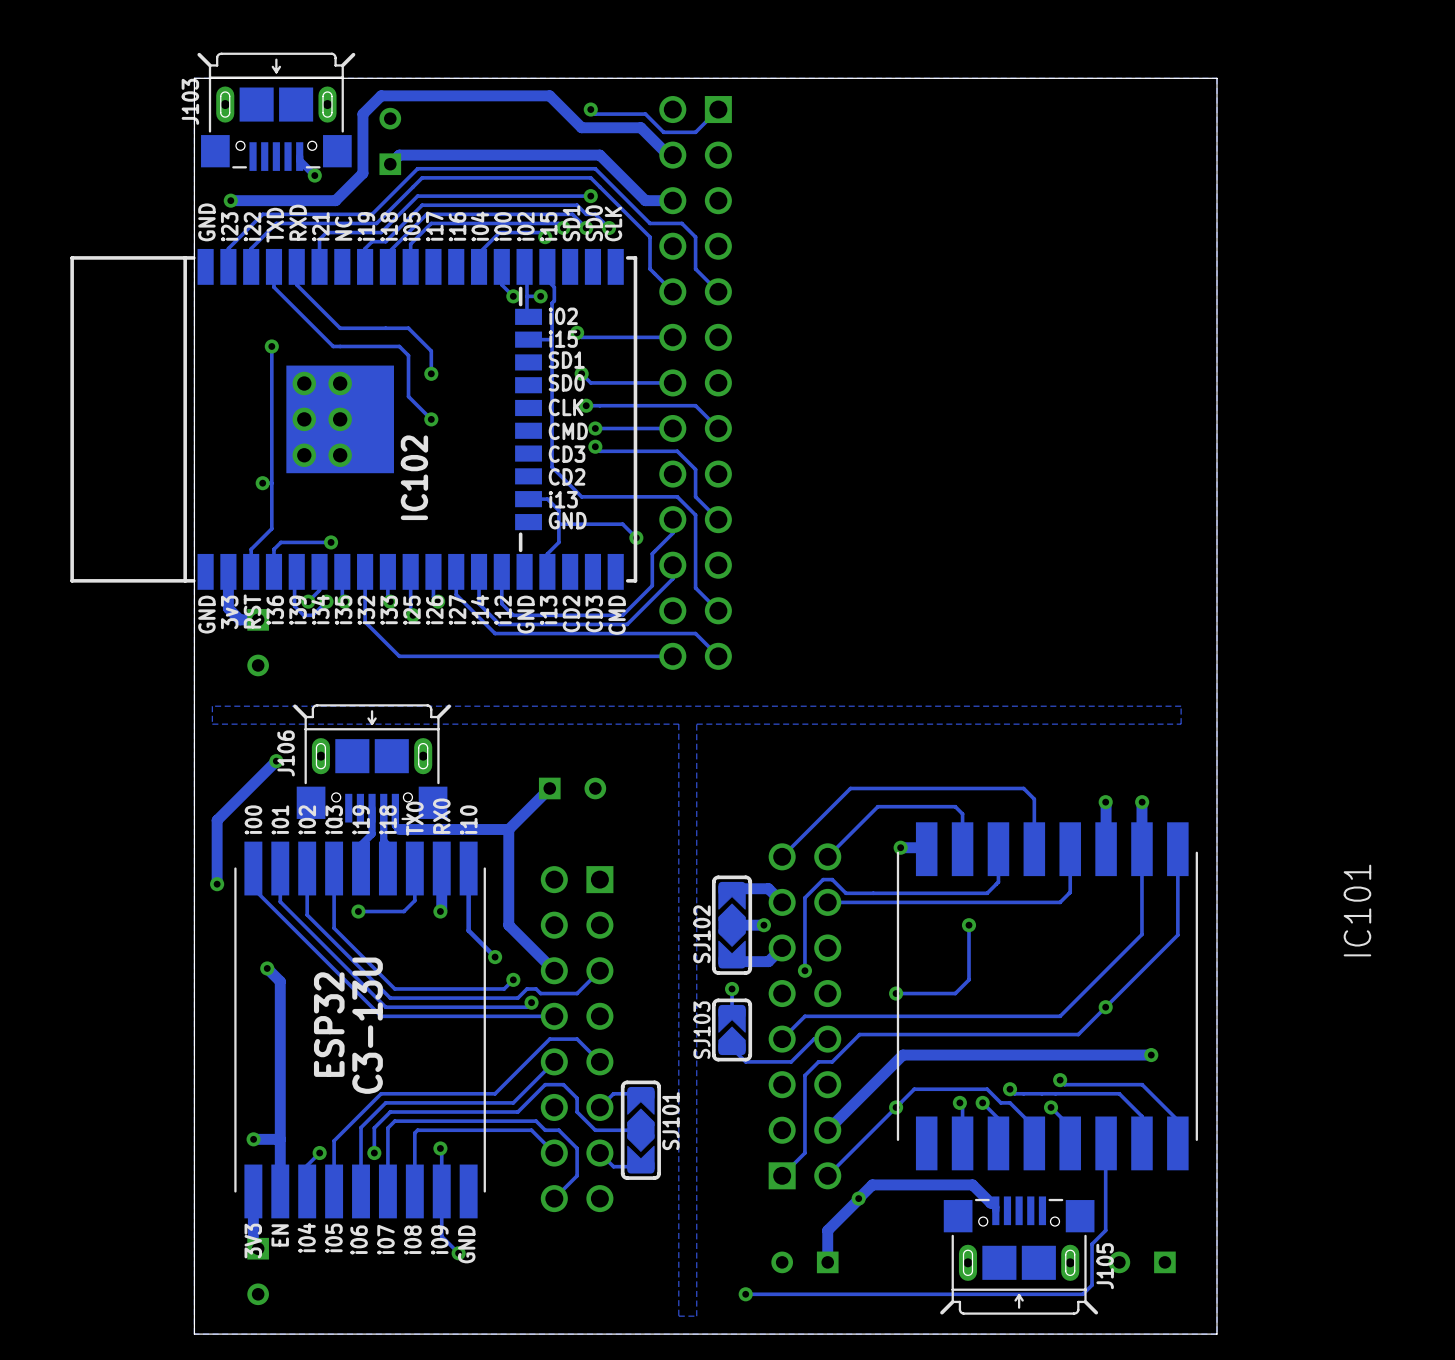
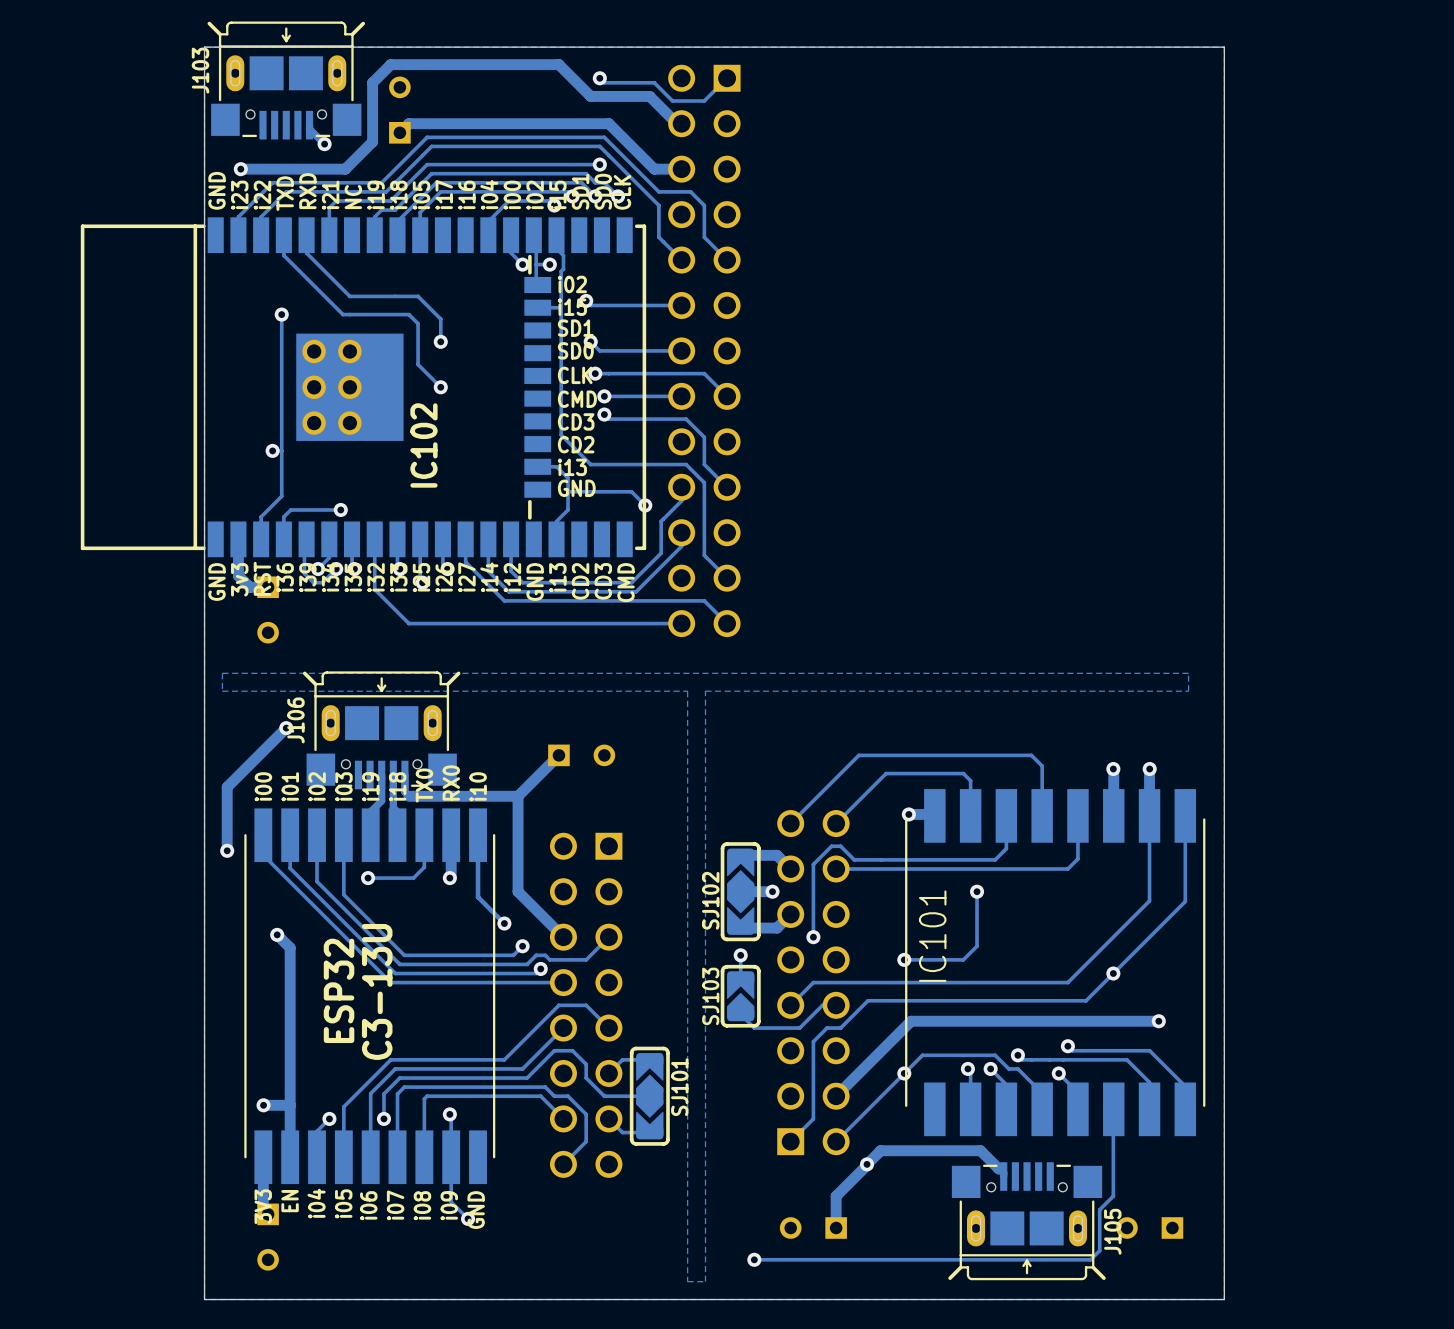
IC101 name position: IC101 (1357, 910) -> IC101 (932, 936)

